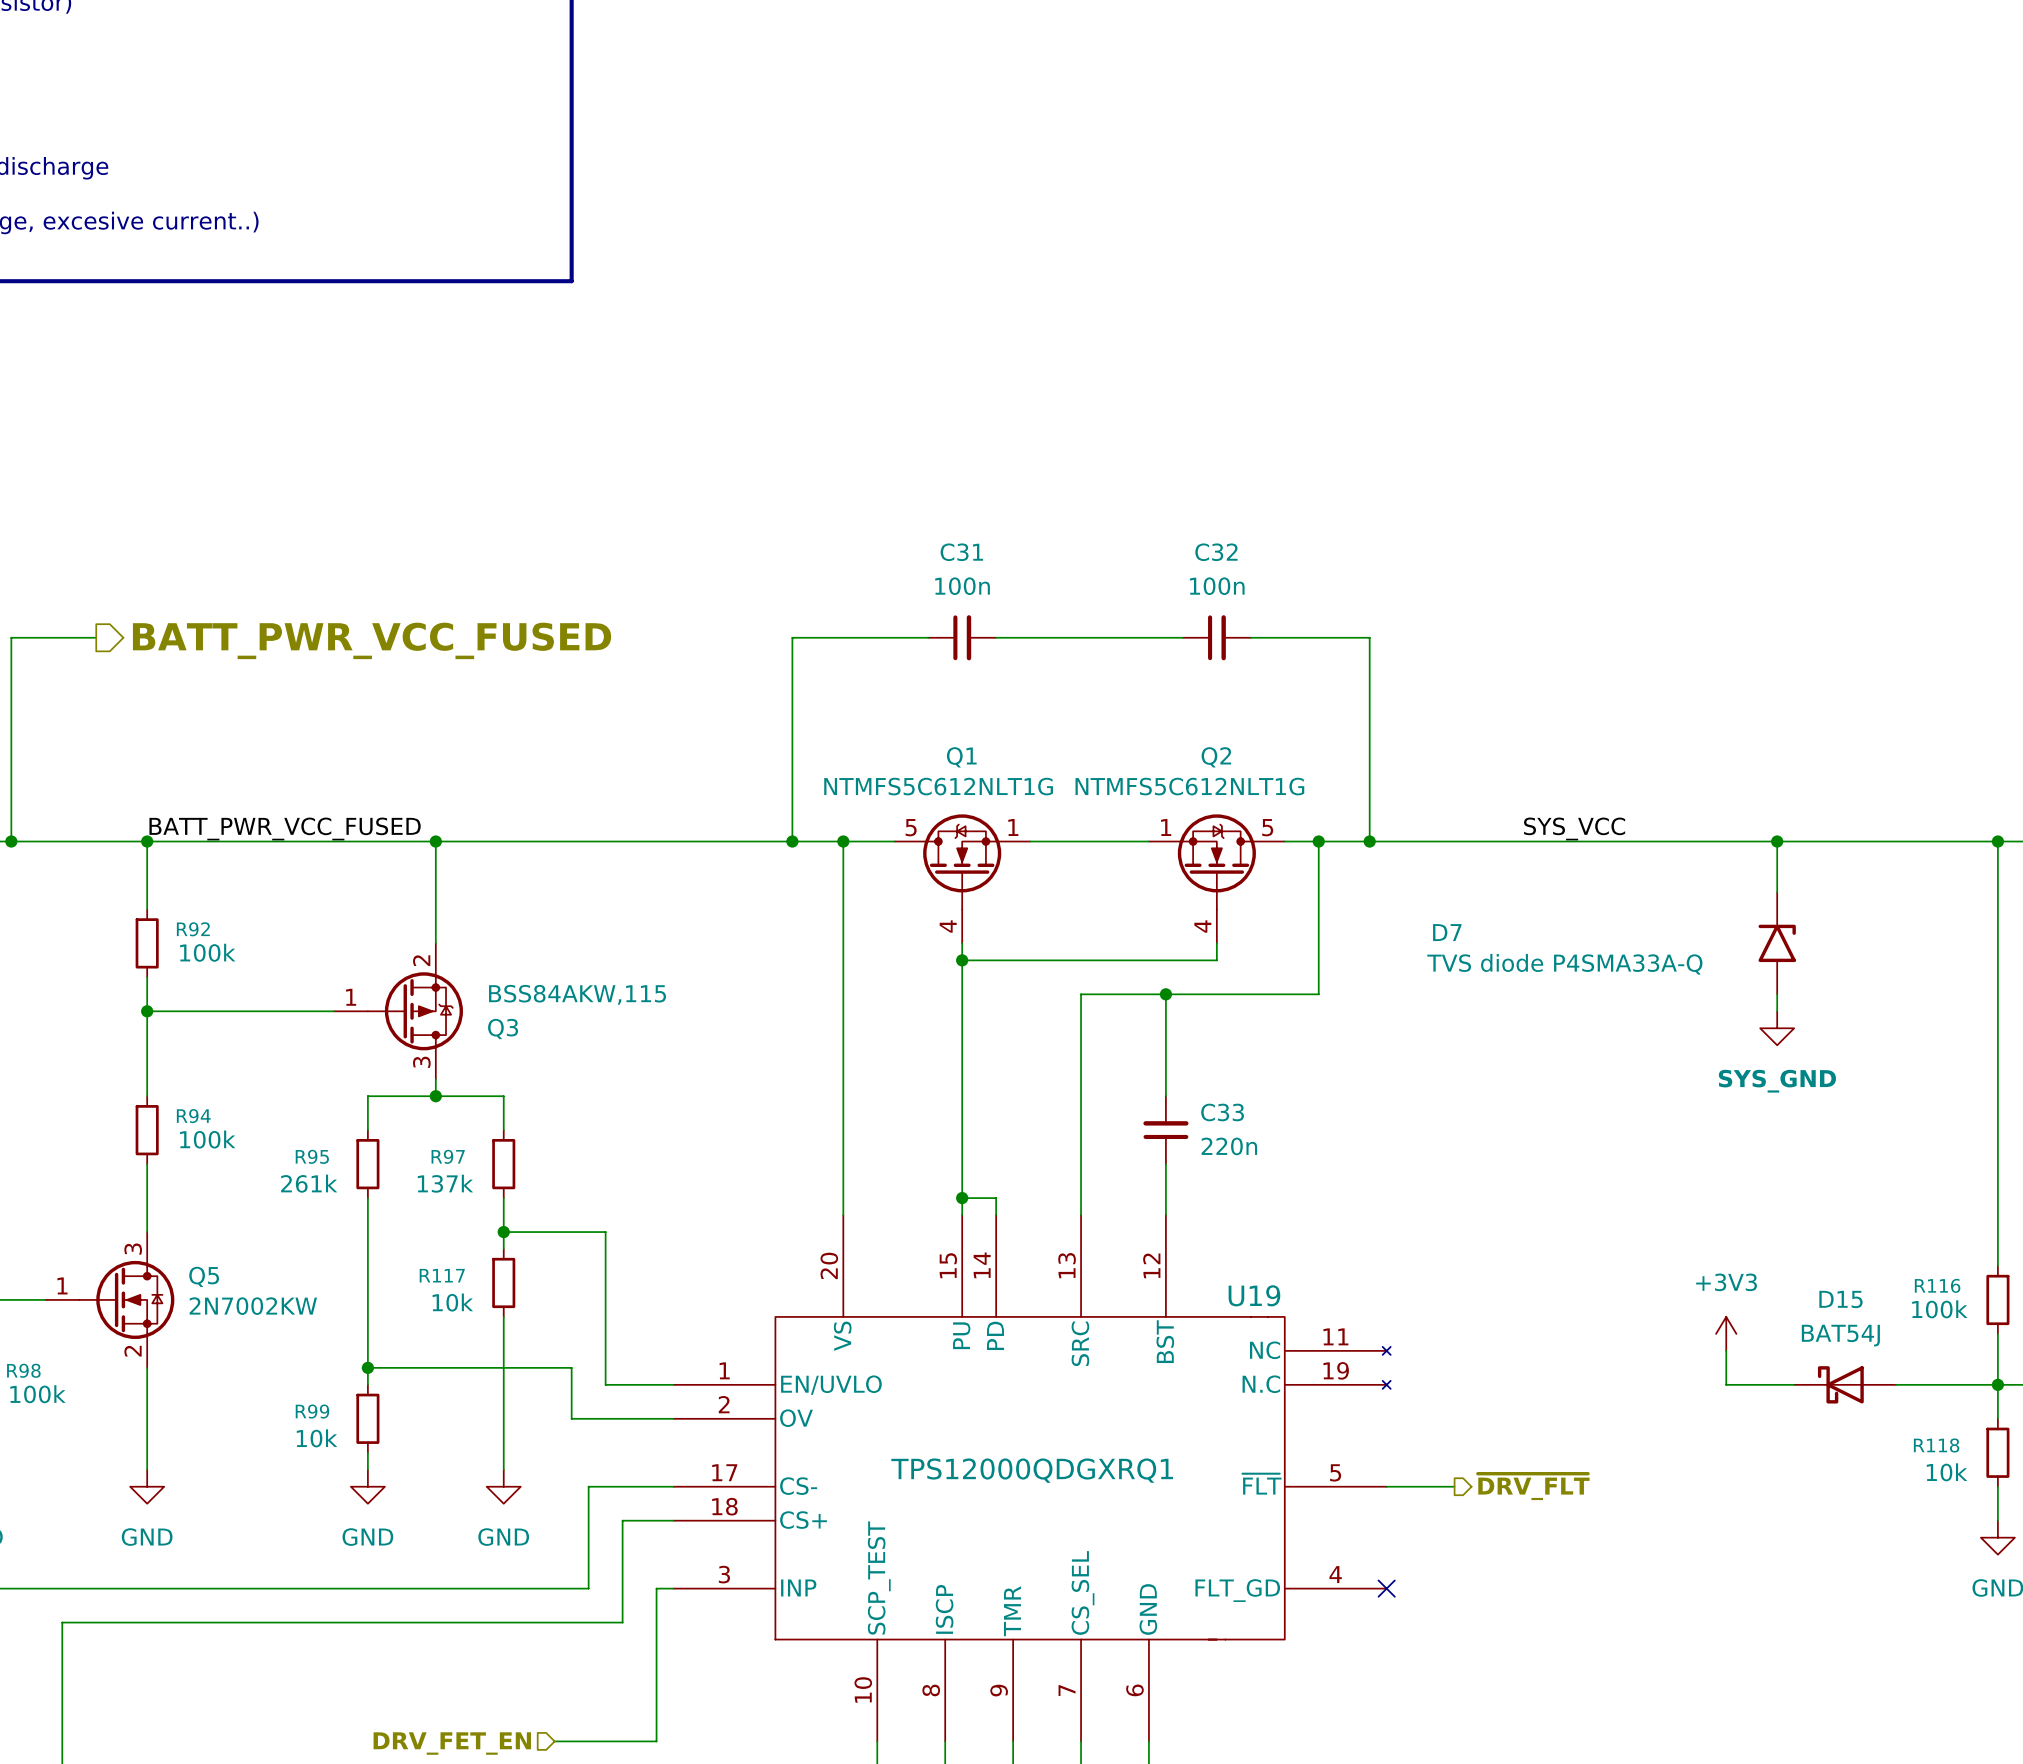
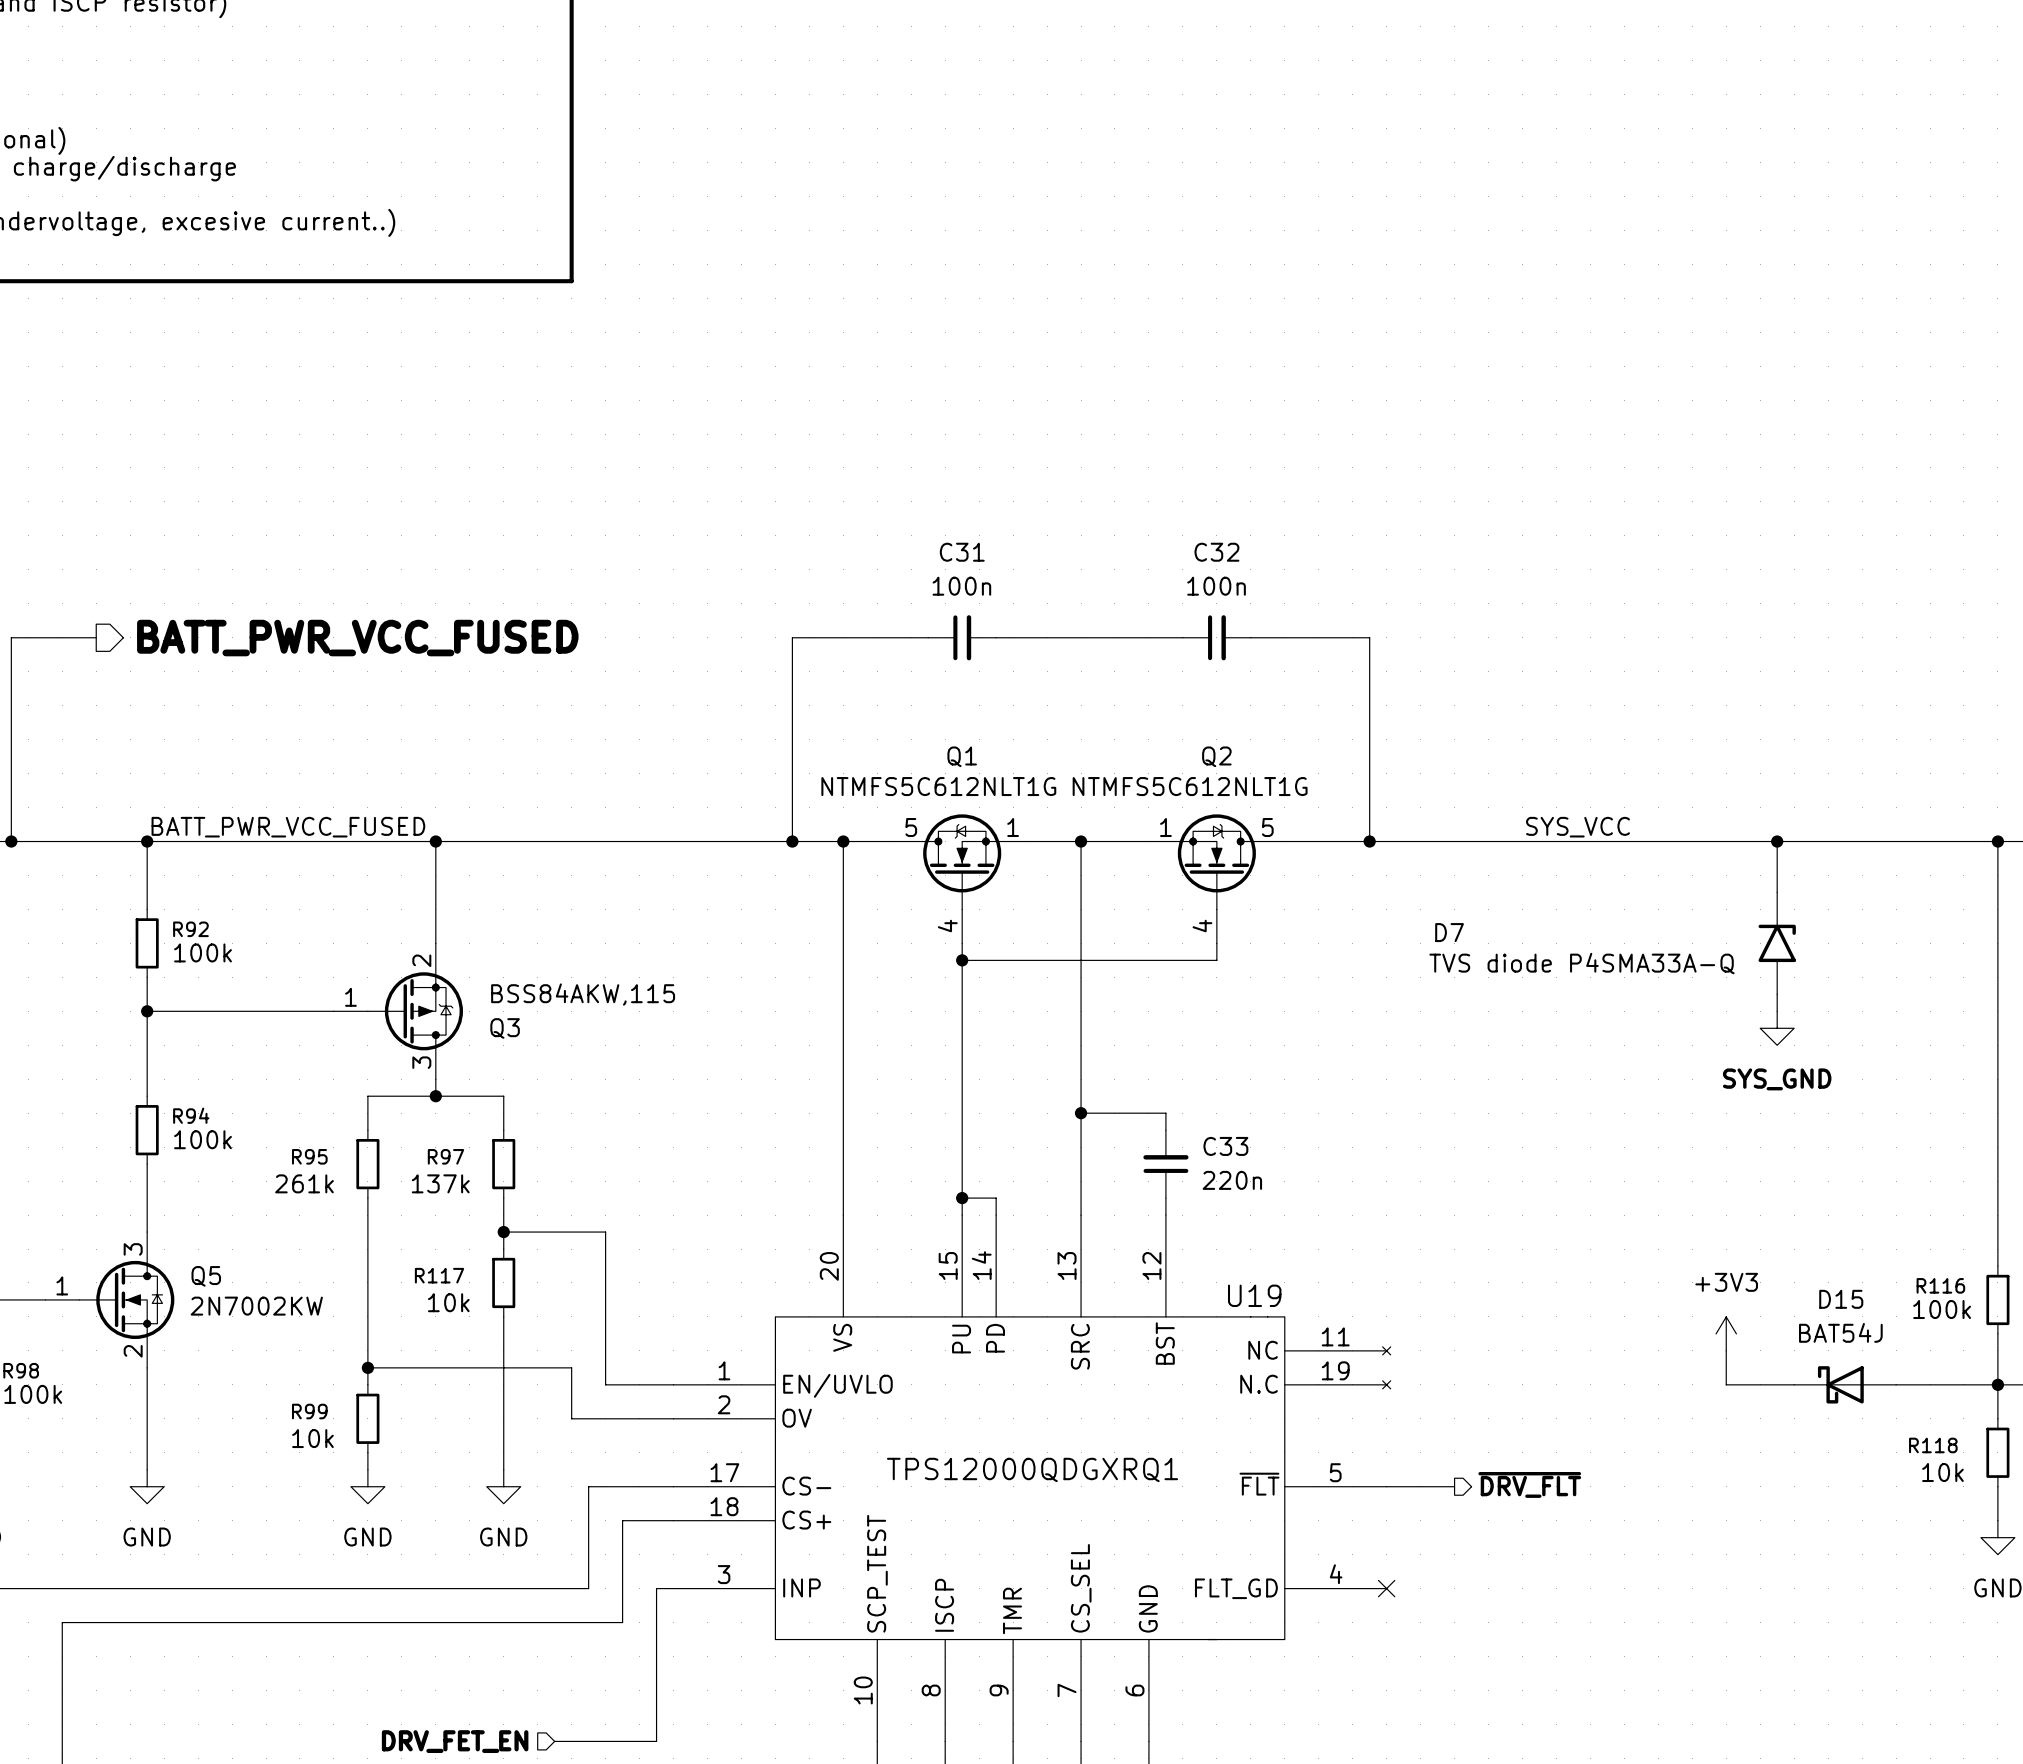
junction: none -> (1081, 841)
wire: (1318, 841) (1318, 994) (1081, 994) -> (1081, 841) (1081, 994)
junction: (1318, 841) -> none
wire: (1165, 994) (1165, 1096) -> none
junction: (1165, 994) -> none
wire: none -> (1081, 1113) (1165, 1113) (1165, 1130)
junction: none -> (1081, 1113)
C33 position: (1165, 1130) -> (1165, 1164)

